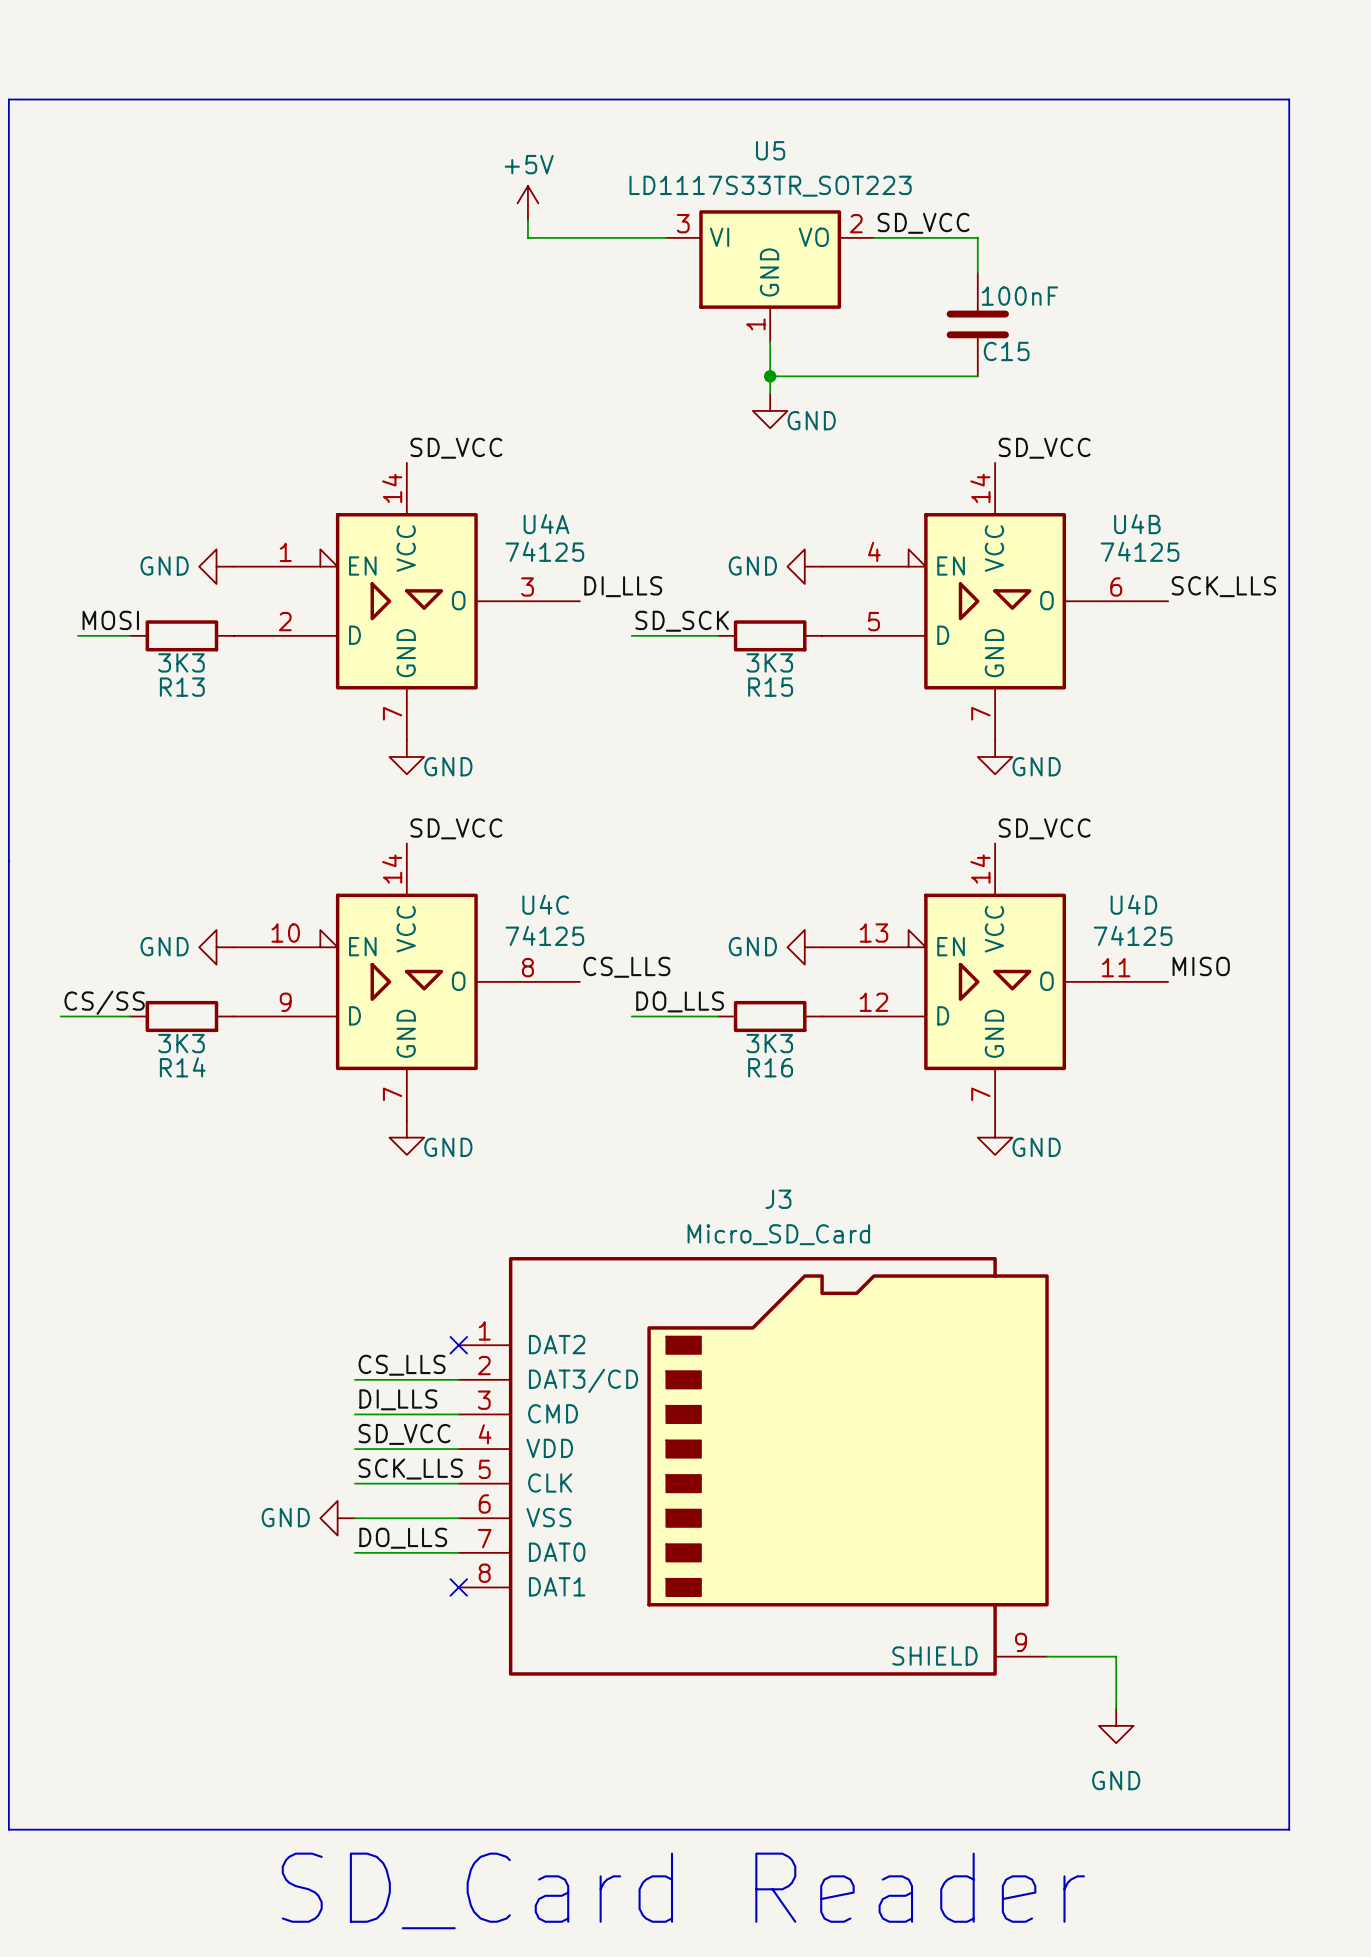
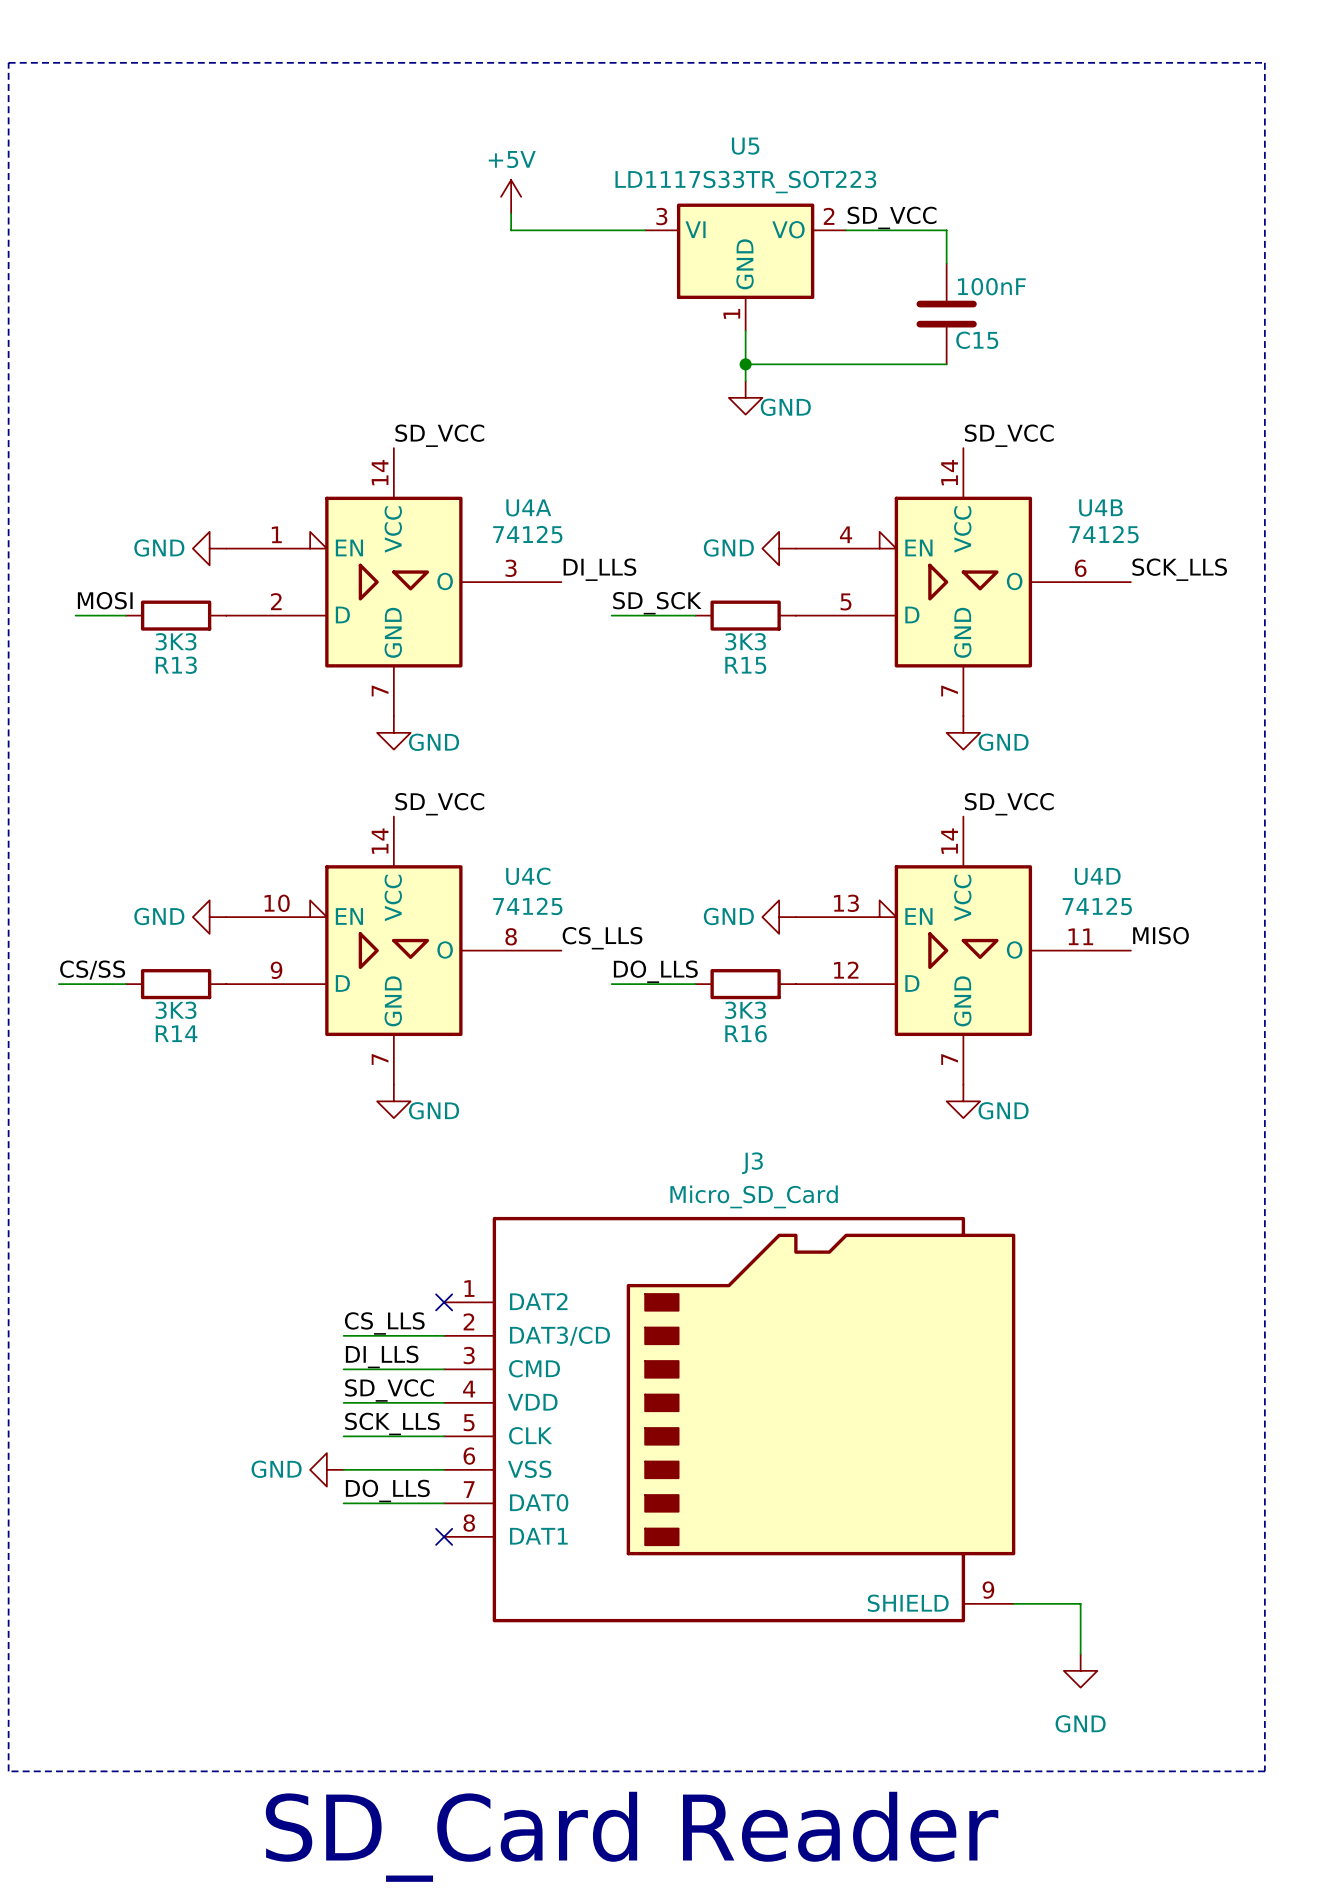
line: (8, 99) (8, 1829) (1289, 1829) (1289, 99) (8, 99) -> (8, 62) (8, 1771) (1264, 1771) (1264, 62) (8, 62)

